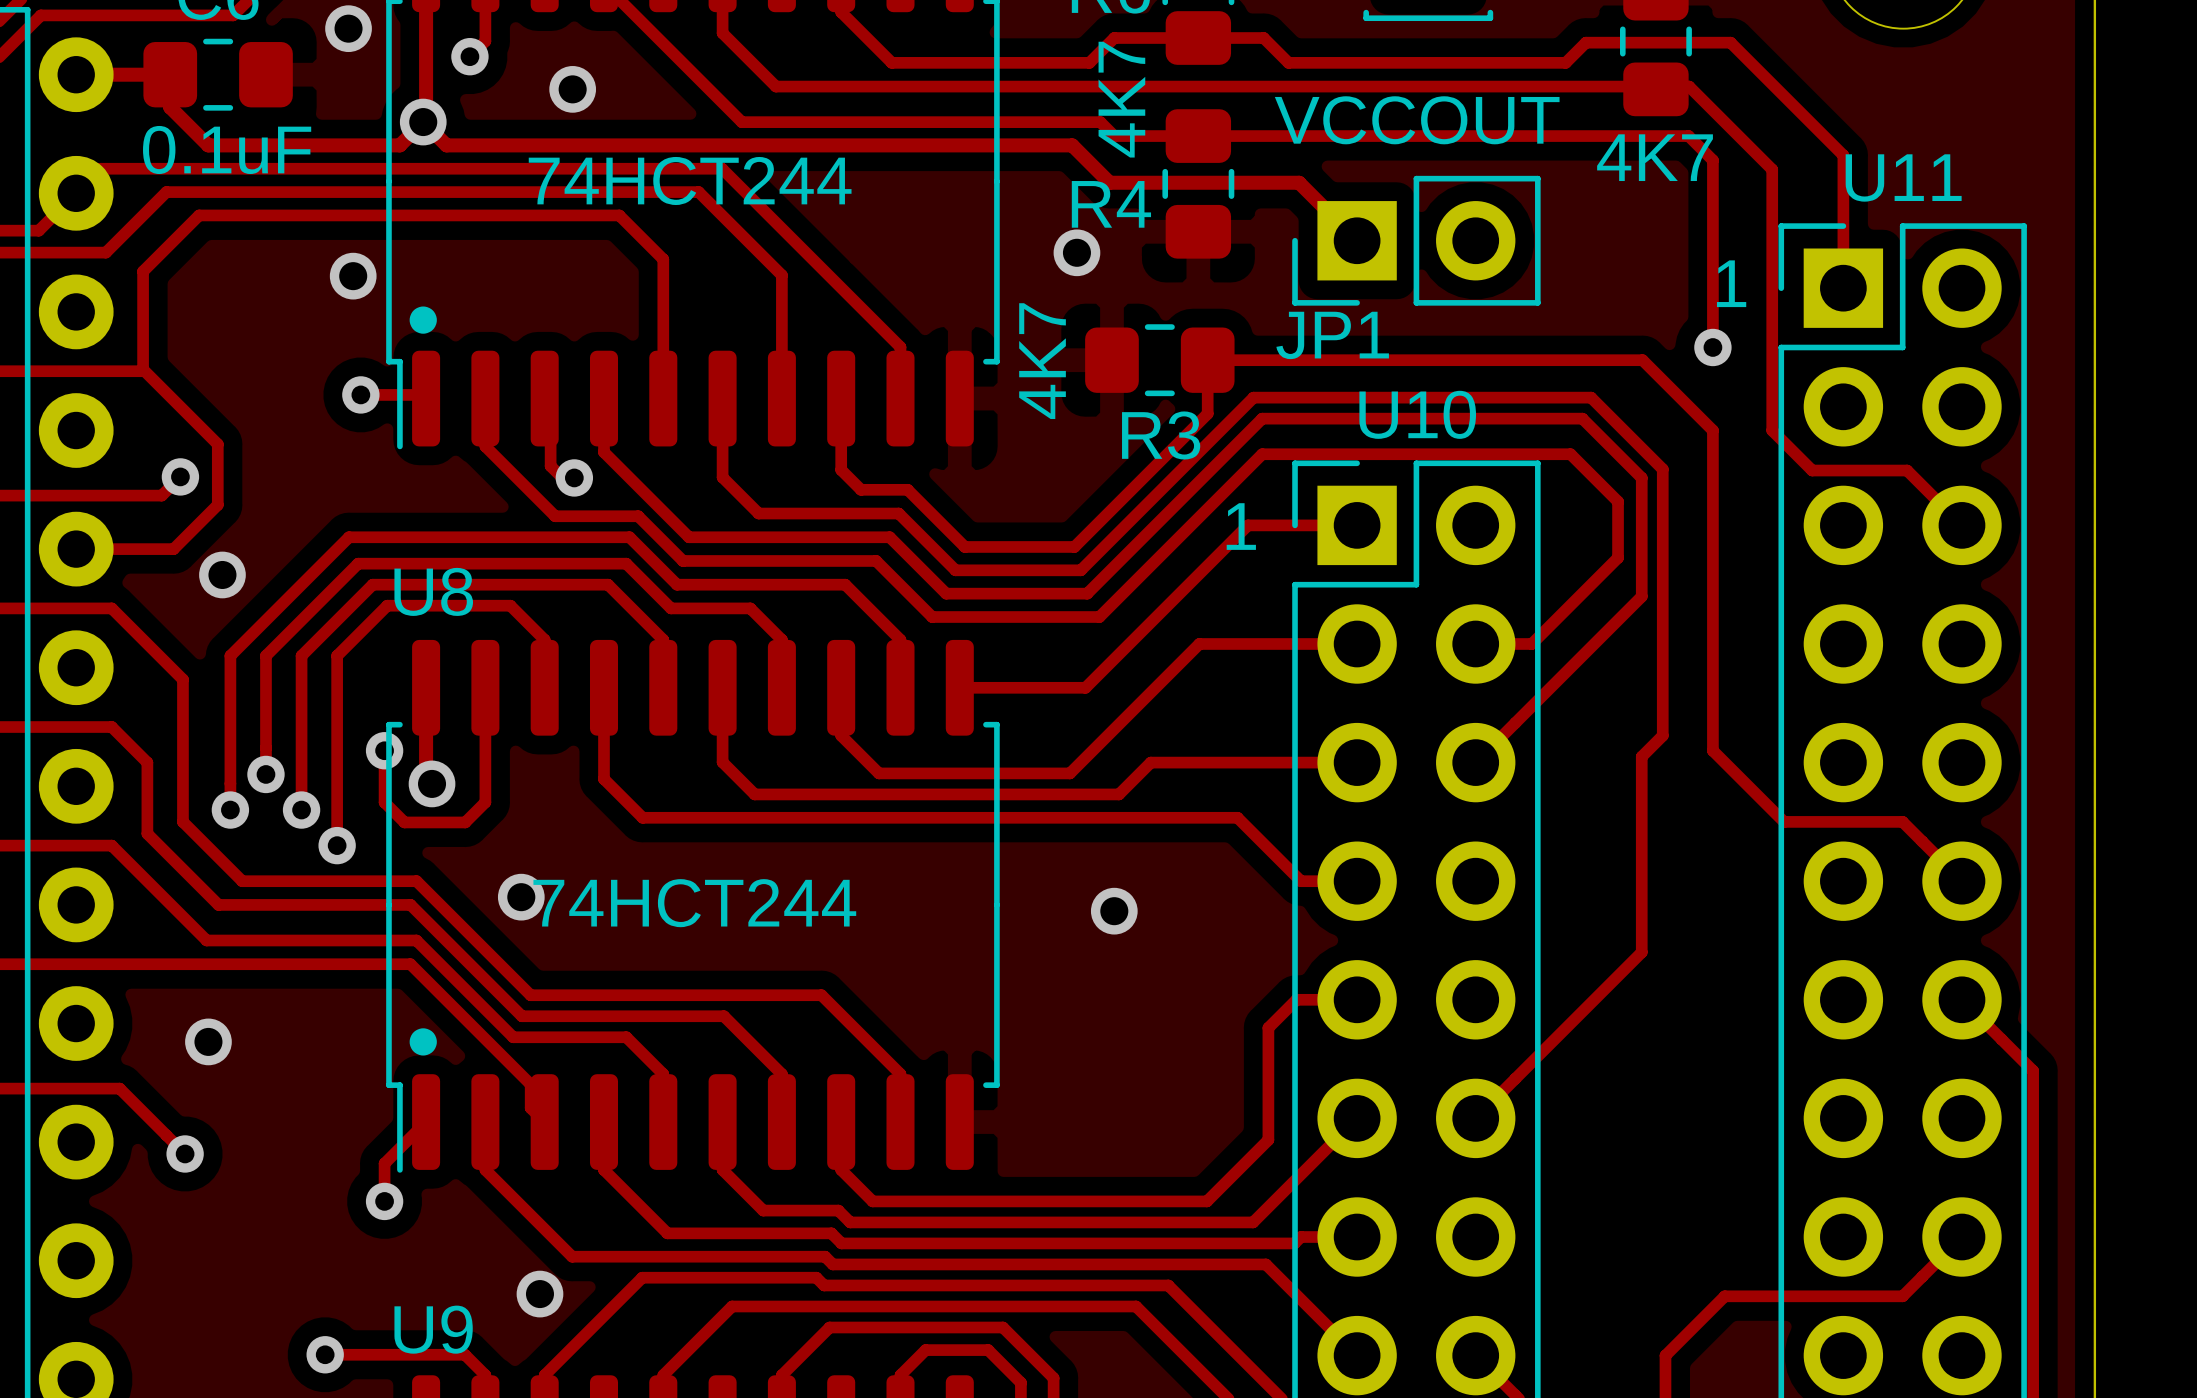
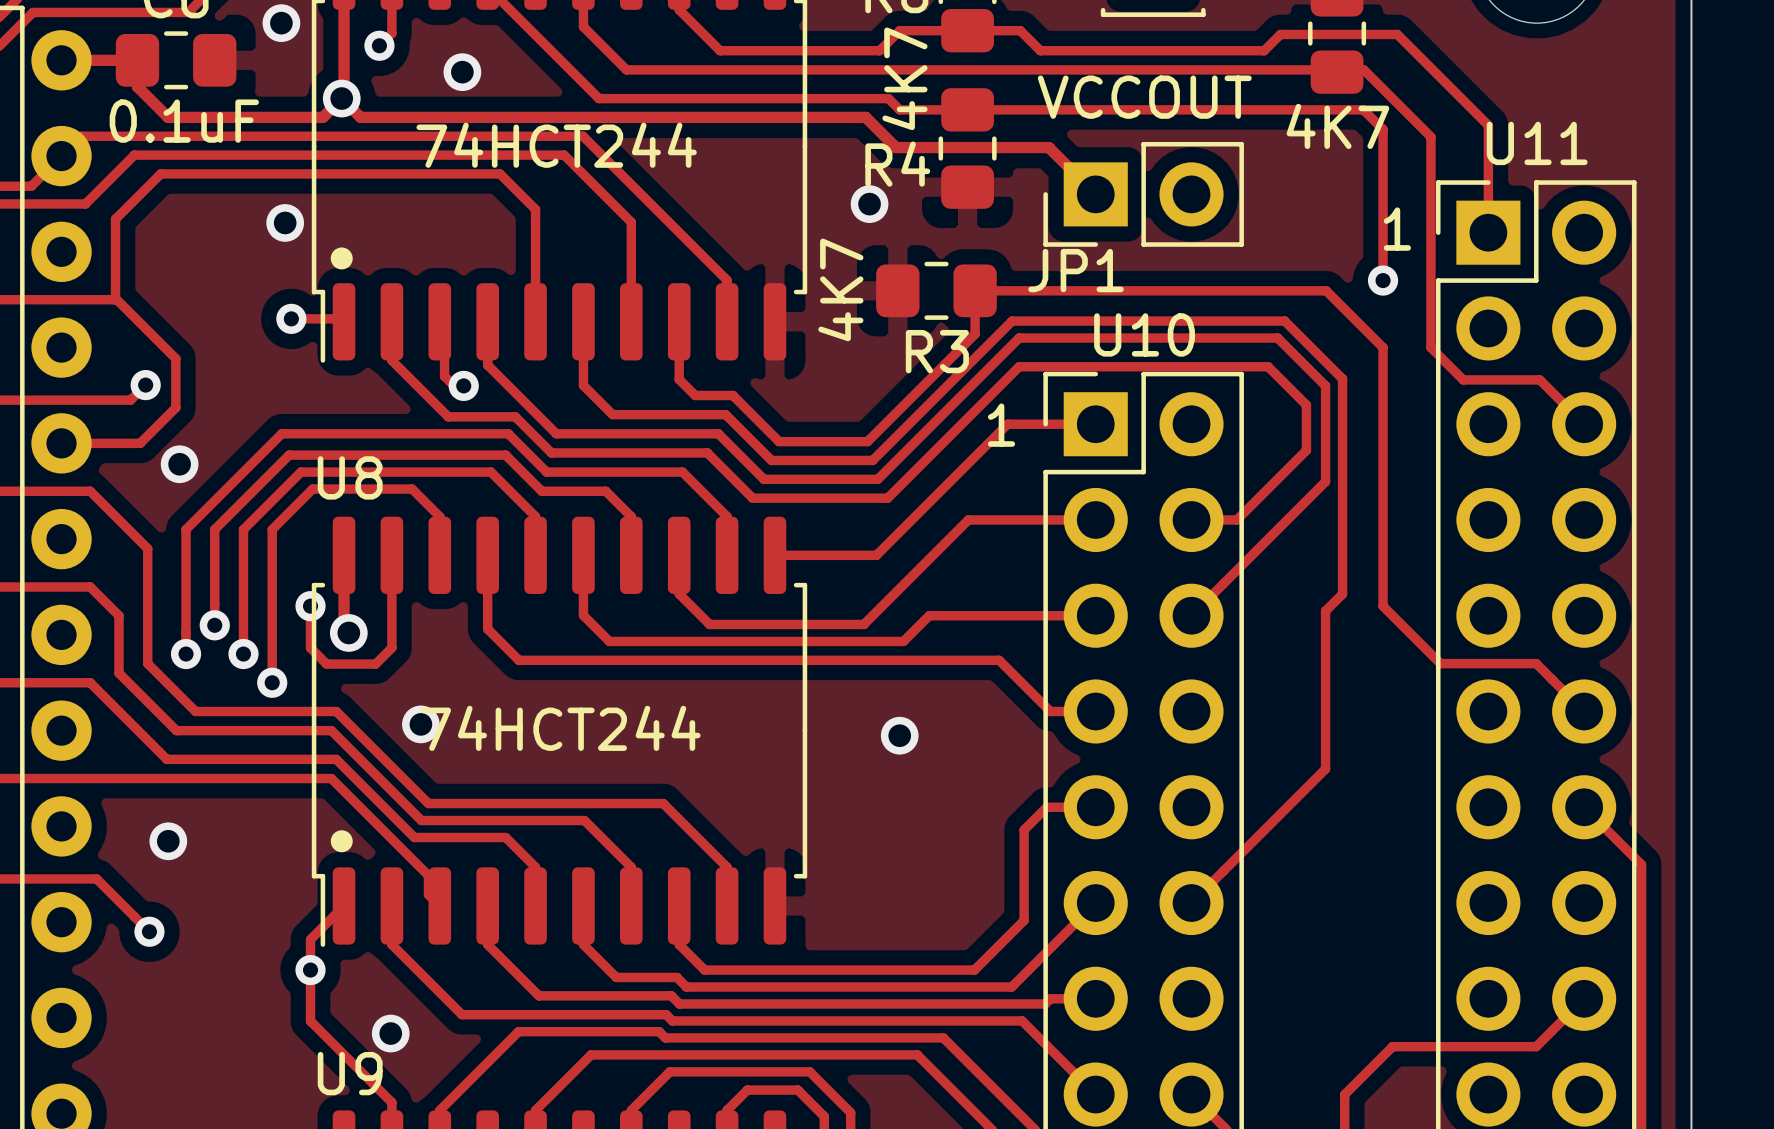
via position: (539, 1294) -> (390, 1033)
track: (325, 1354) (464, 1354) (485, 1375) -> (310, 970) (310, 1021) (391, 1102) (391, 1110)
via: (325, 1354) -> none

